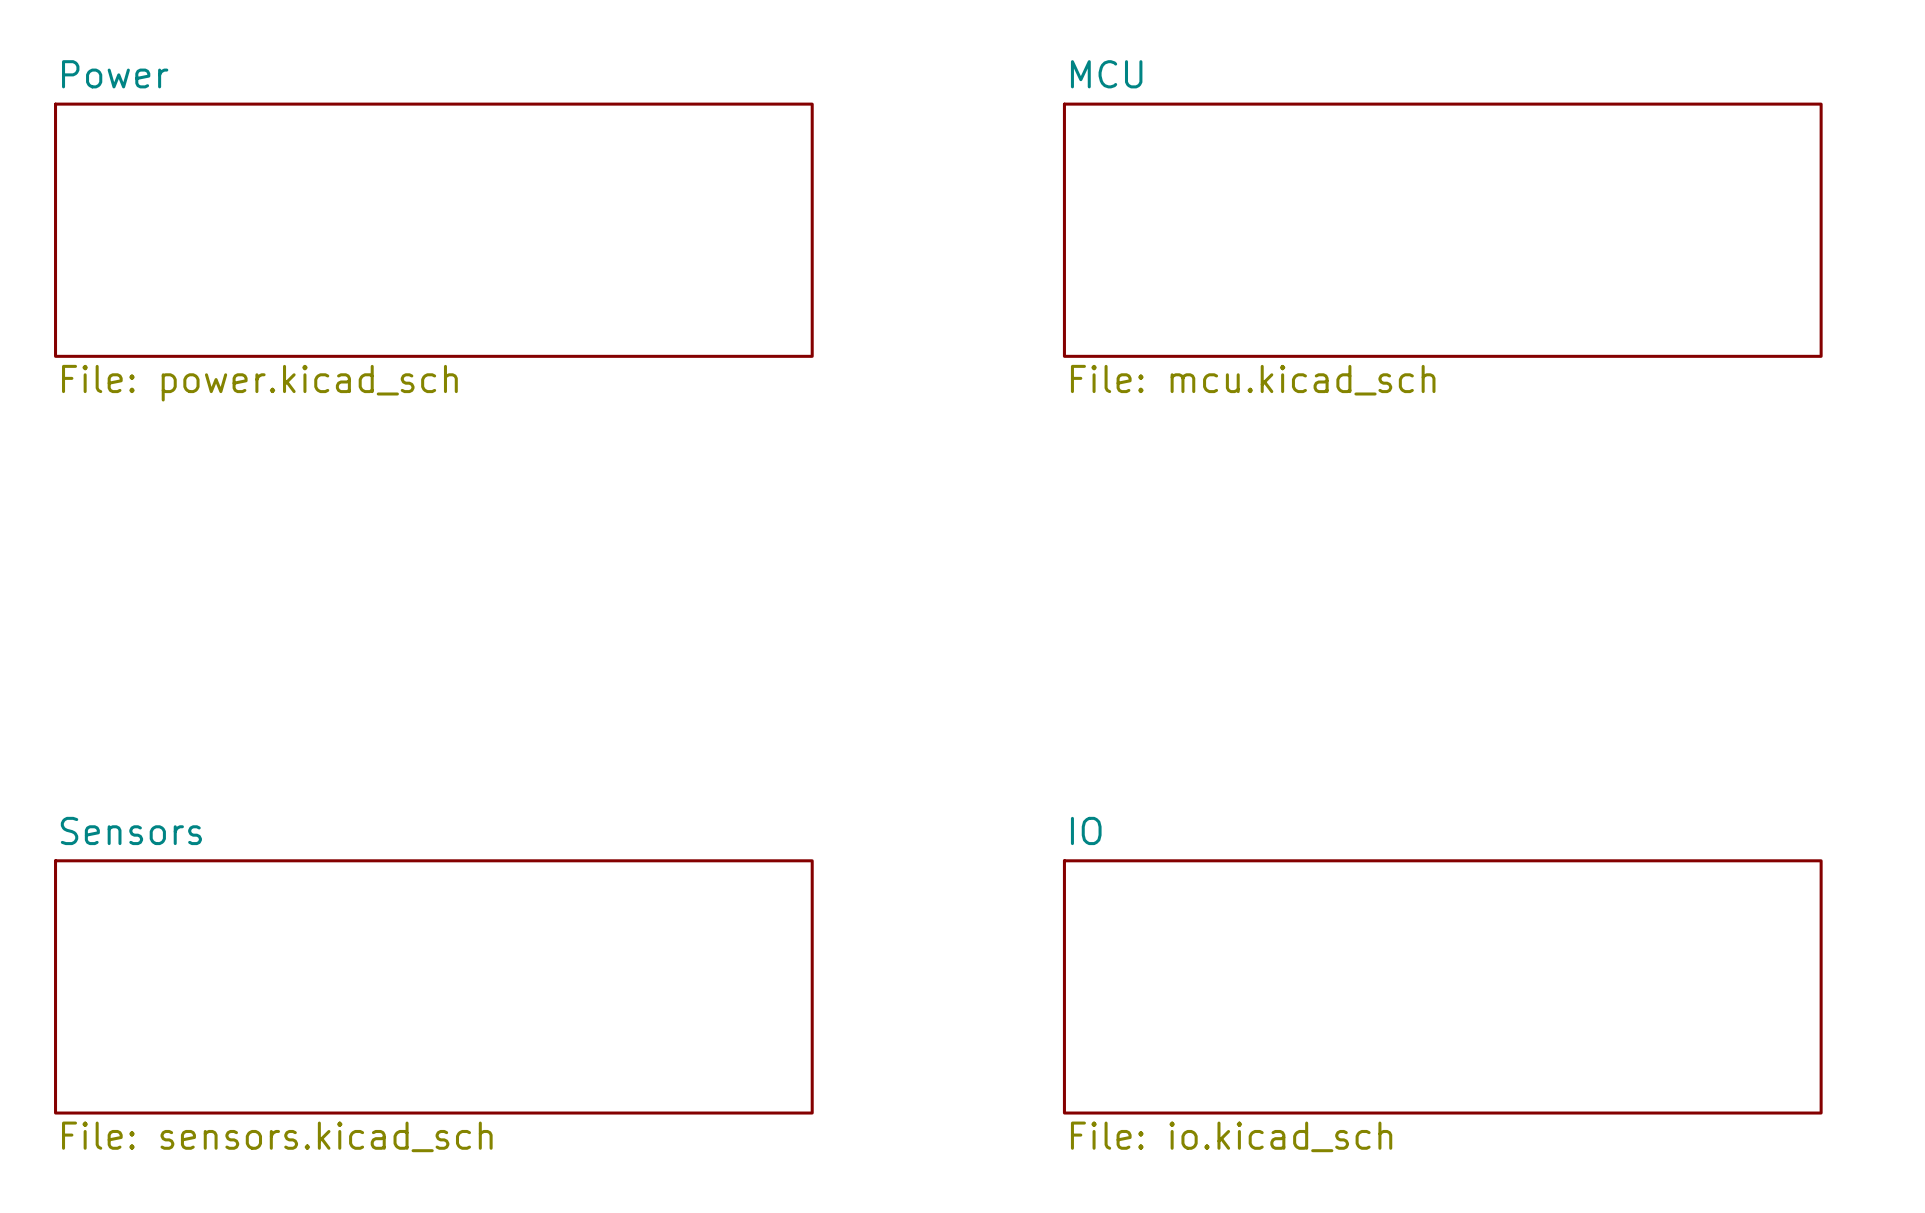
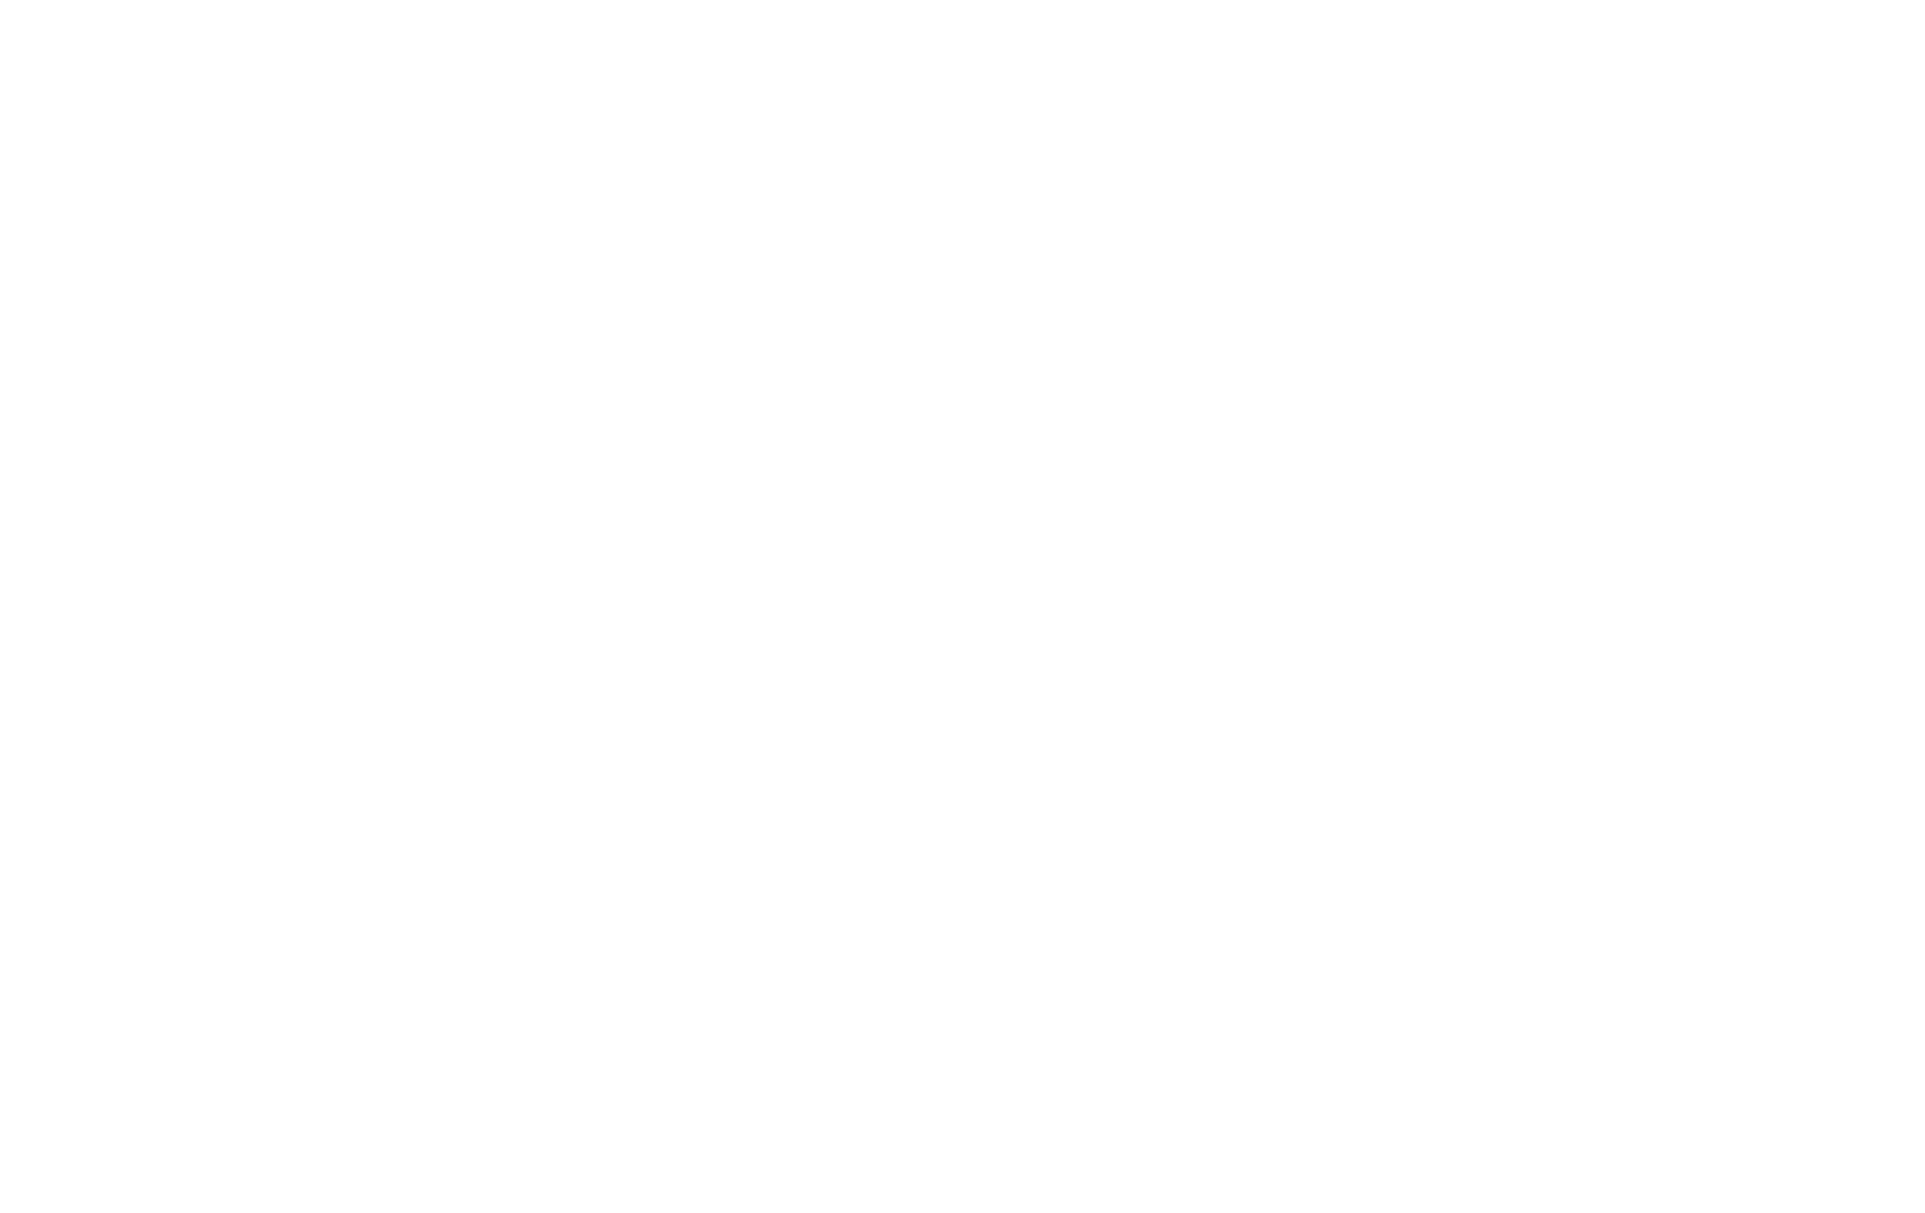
sheet Power: File: power.kicad_sch (433, 230) -> none
sheet MCU: File: mcu.kicad_sch (1442, 230) -> none
sheet Sensors: File: sensors.kicad_sch (433, 986) -> none
sheet IO: File: io.kicad_sch (1442, 986) -> none

